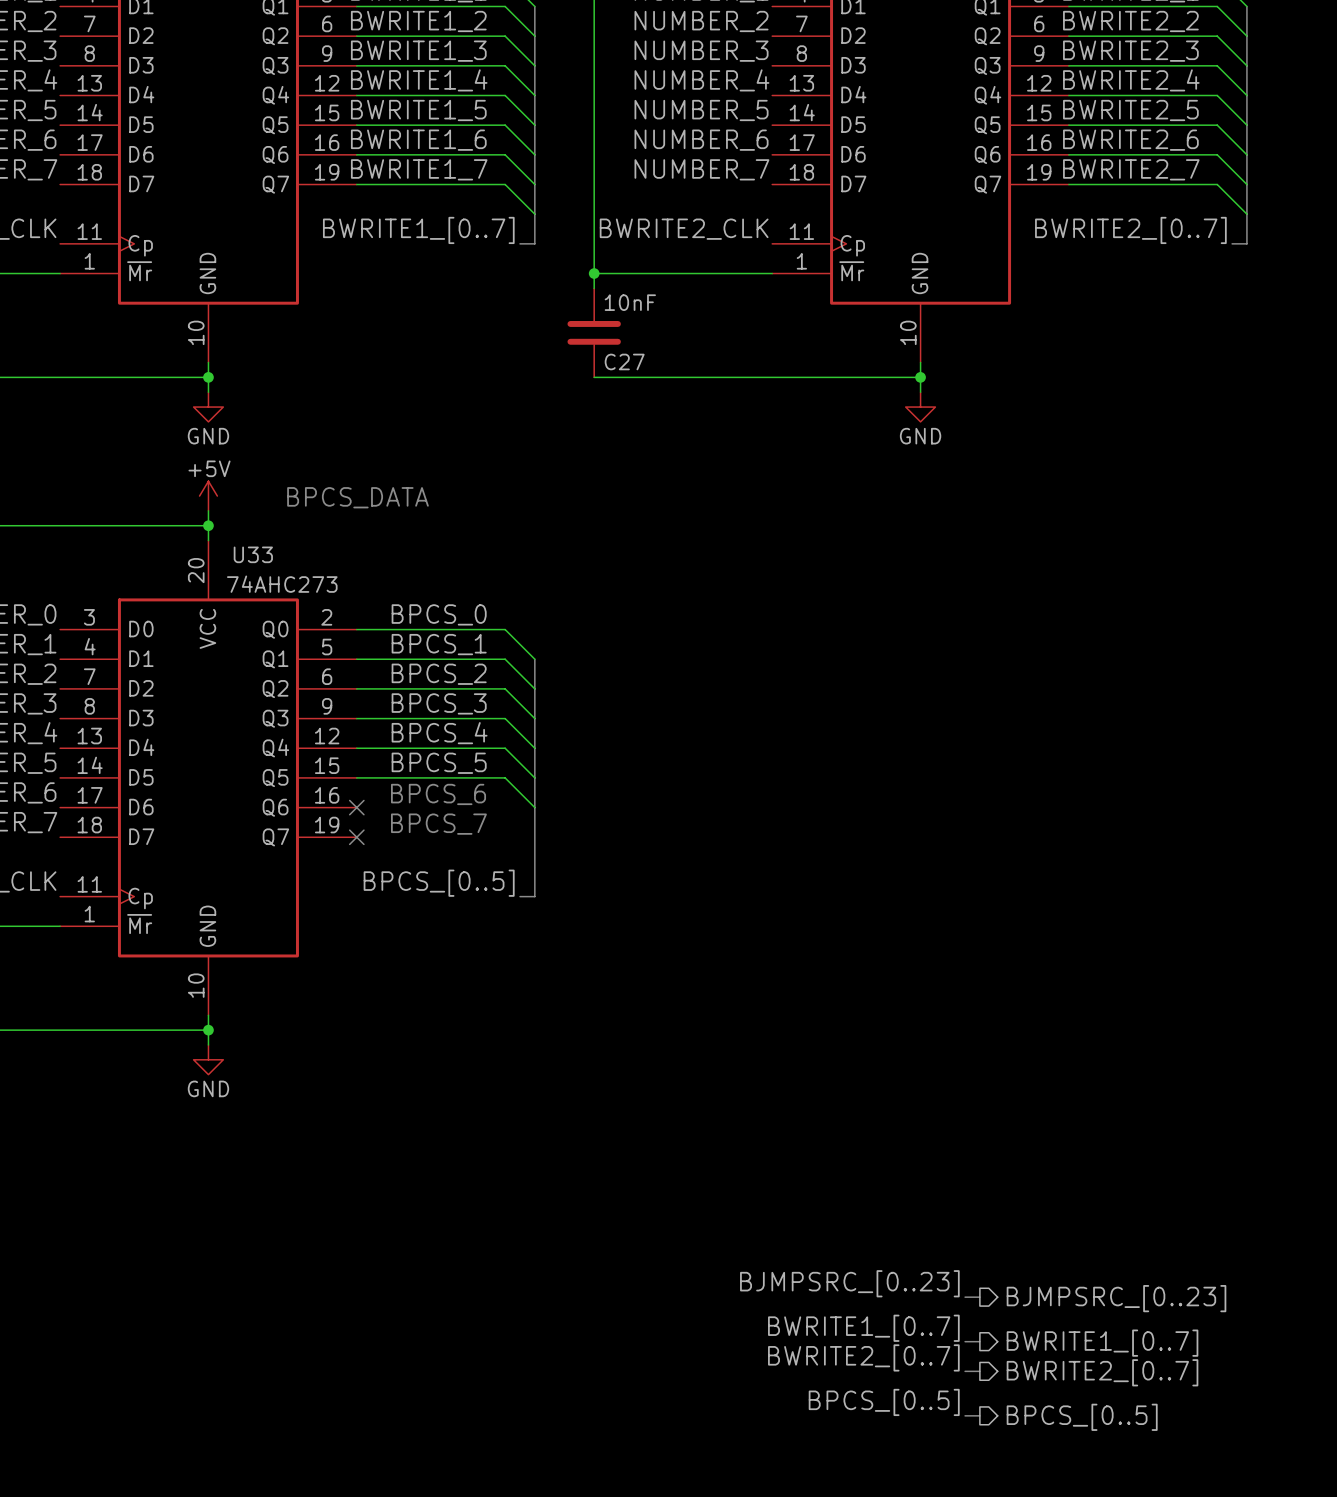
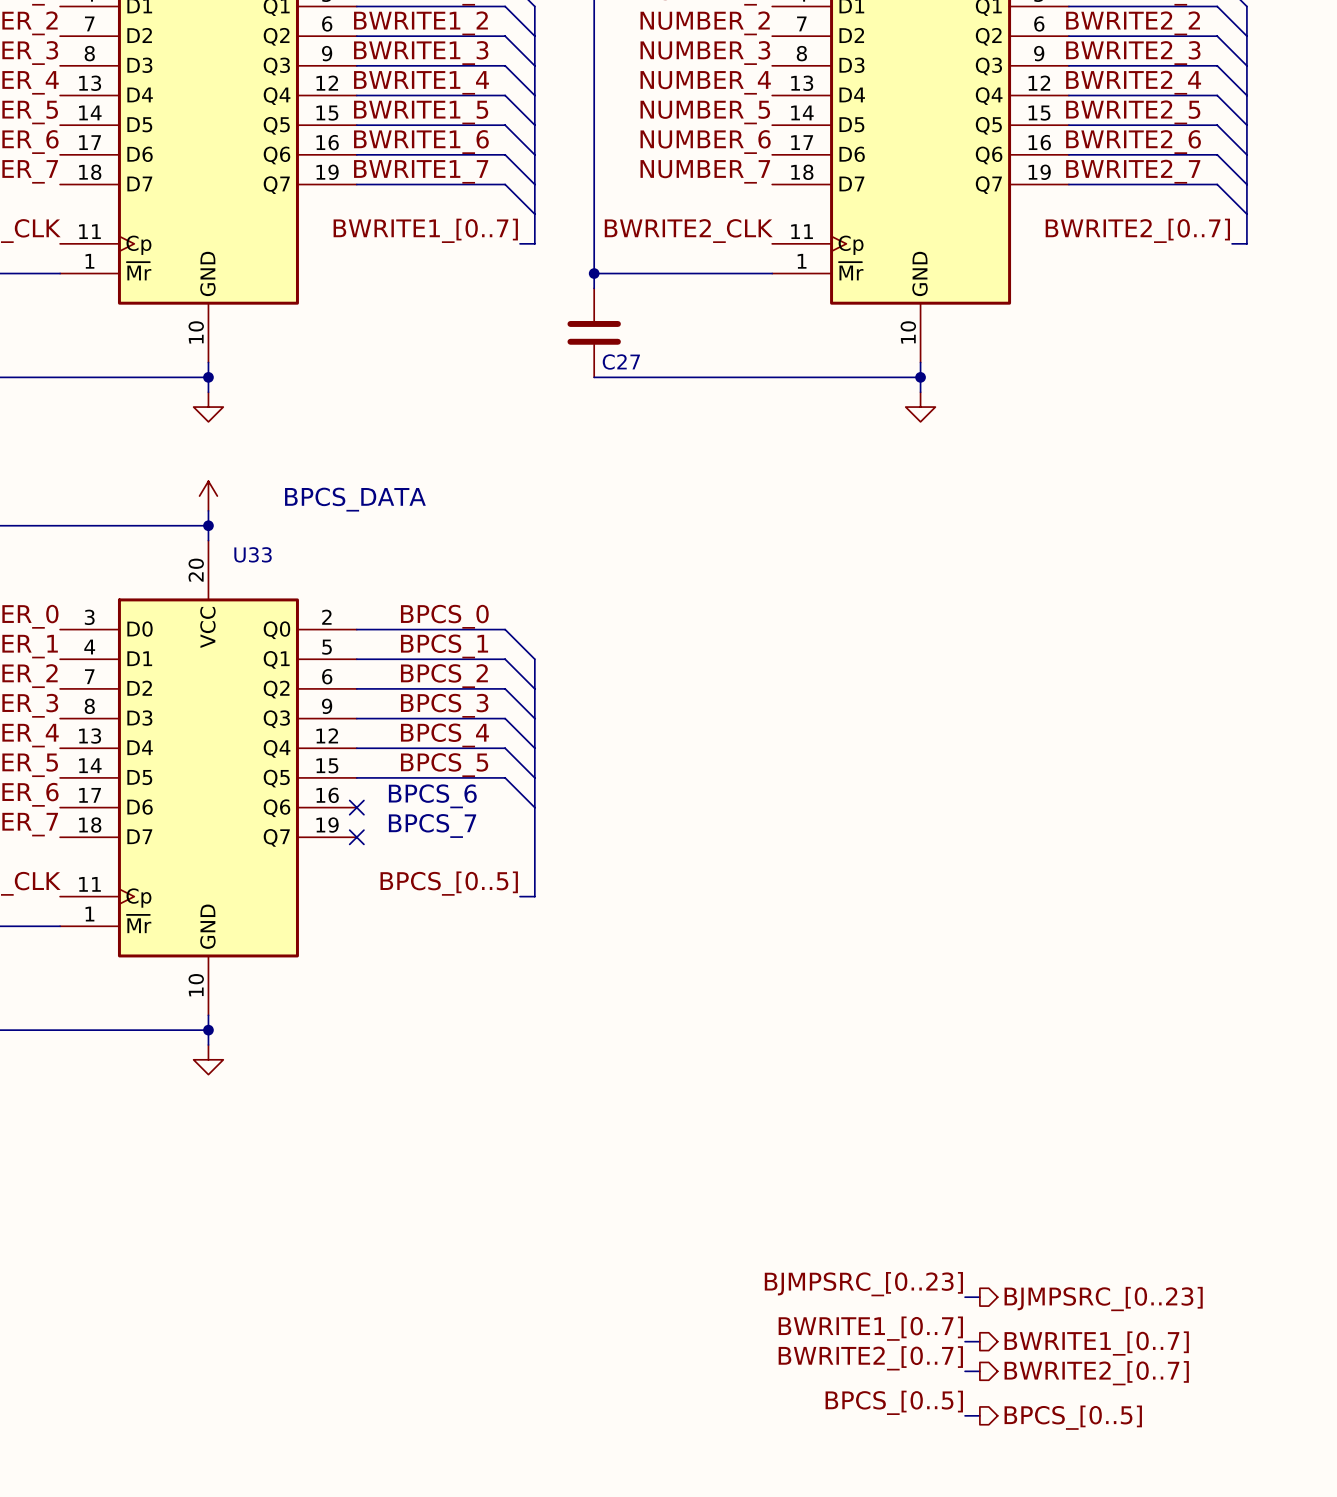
C27 value: 10nF (630, 302) -> none
power symbol text: GND (208, 436) -> none
power symbol text: GND (920, 436) -> none
power symbol text: +5V (209, 468) -> none
U33 value: 74AHC273 (282, 584) -> none
power symbol text: GND (208, 1088) -> none

